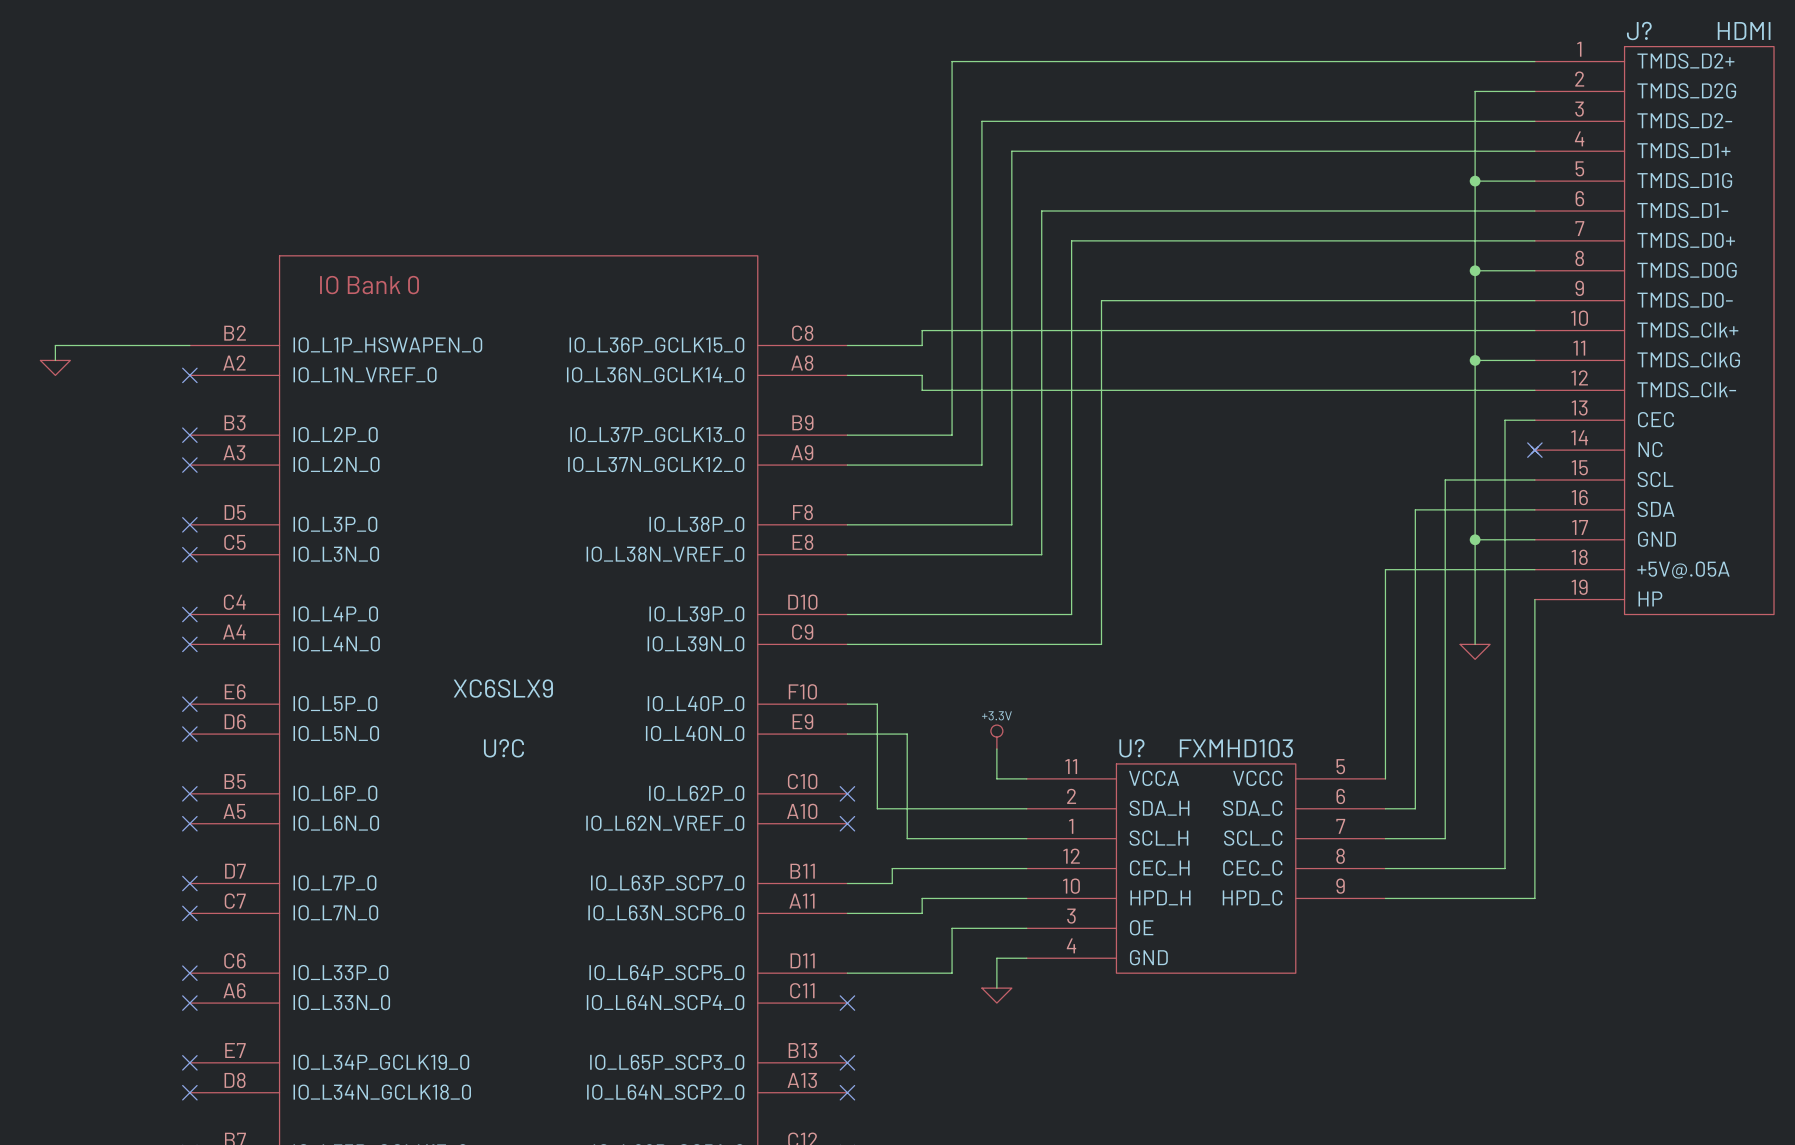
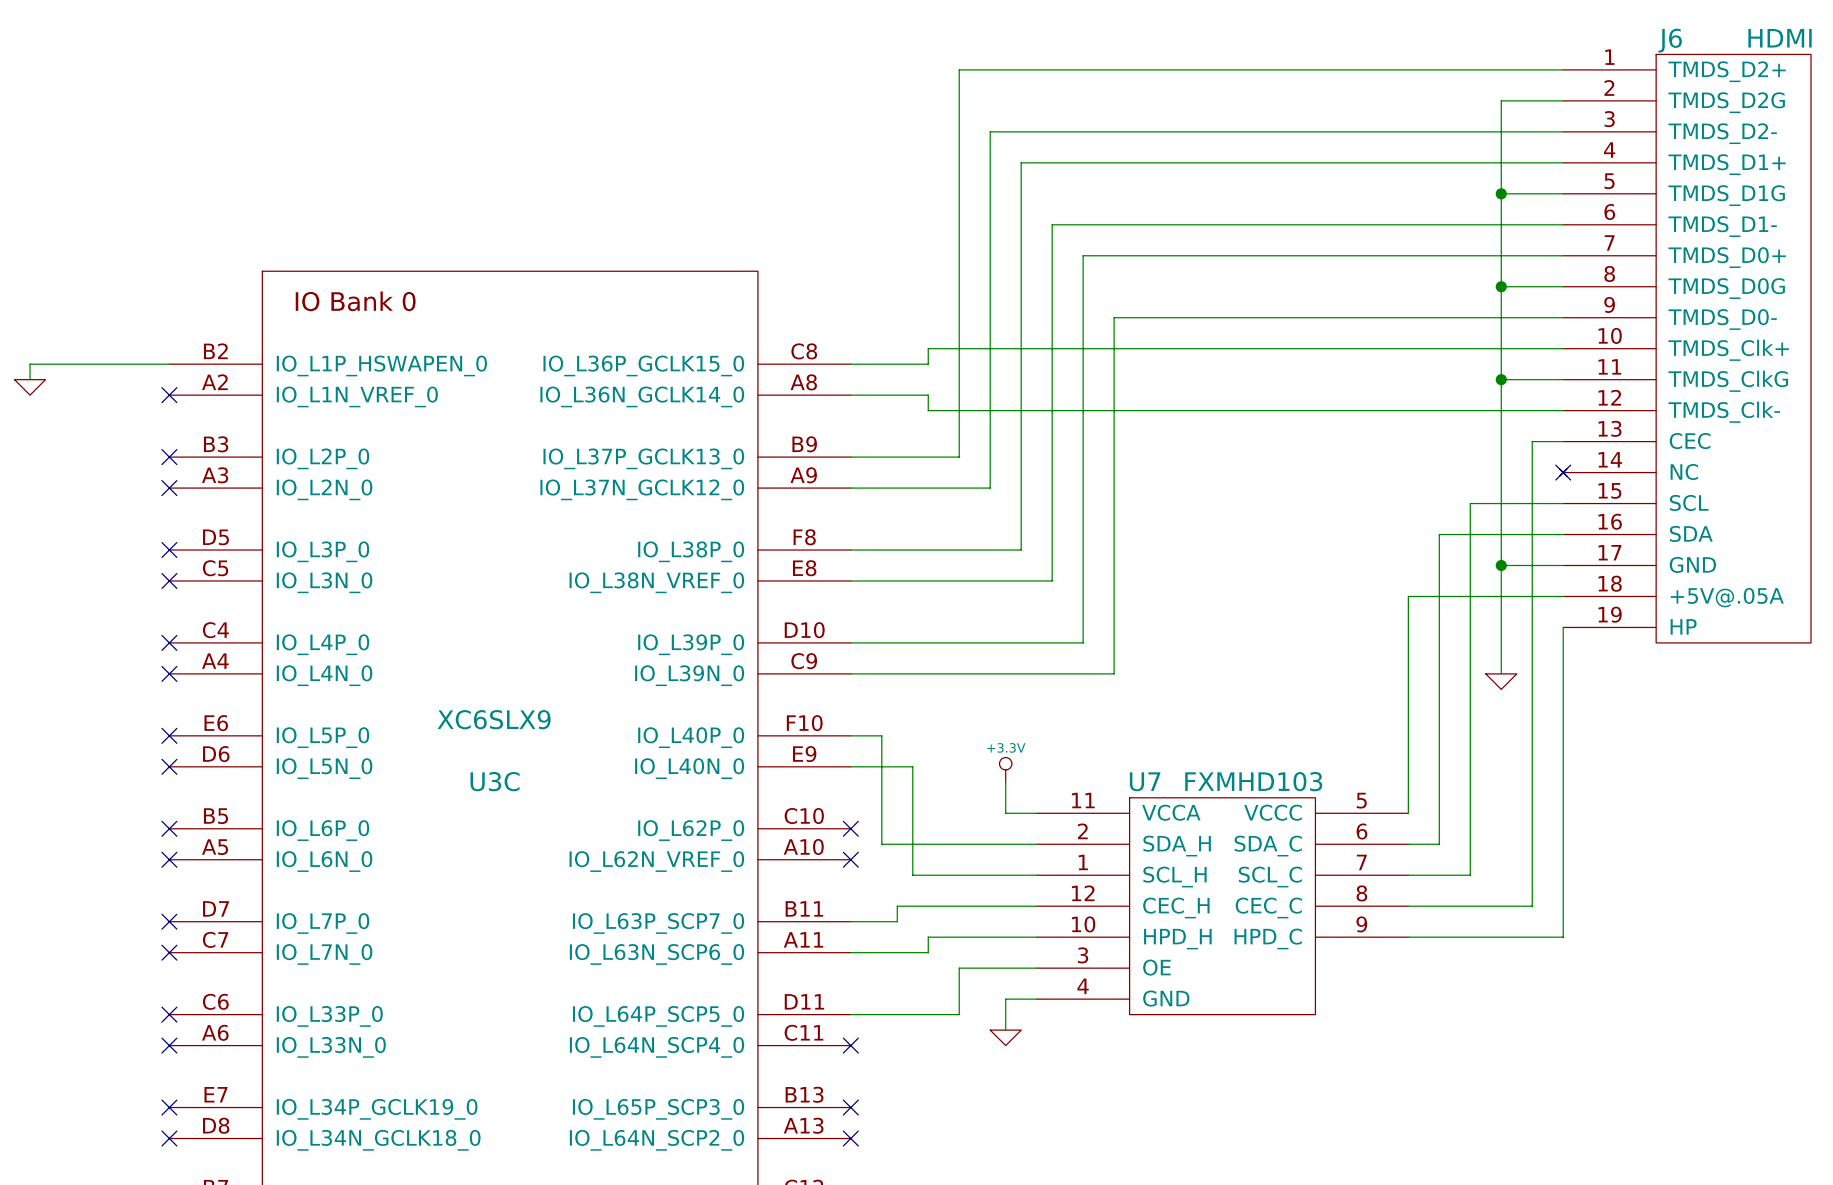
J? name: J? (1639, 30) -> J6 (1670, 40)
U?C name: U?C (503, 748) -> U3C (495, 781)
U? name: U? (1131, 748) -> U7 (1145, 781)

